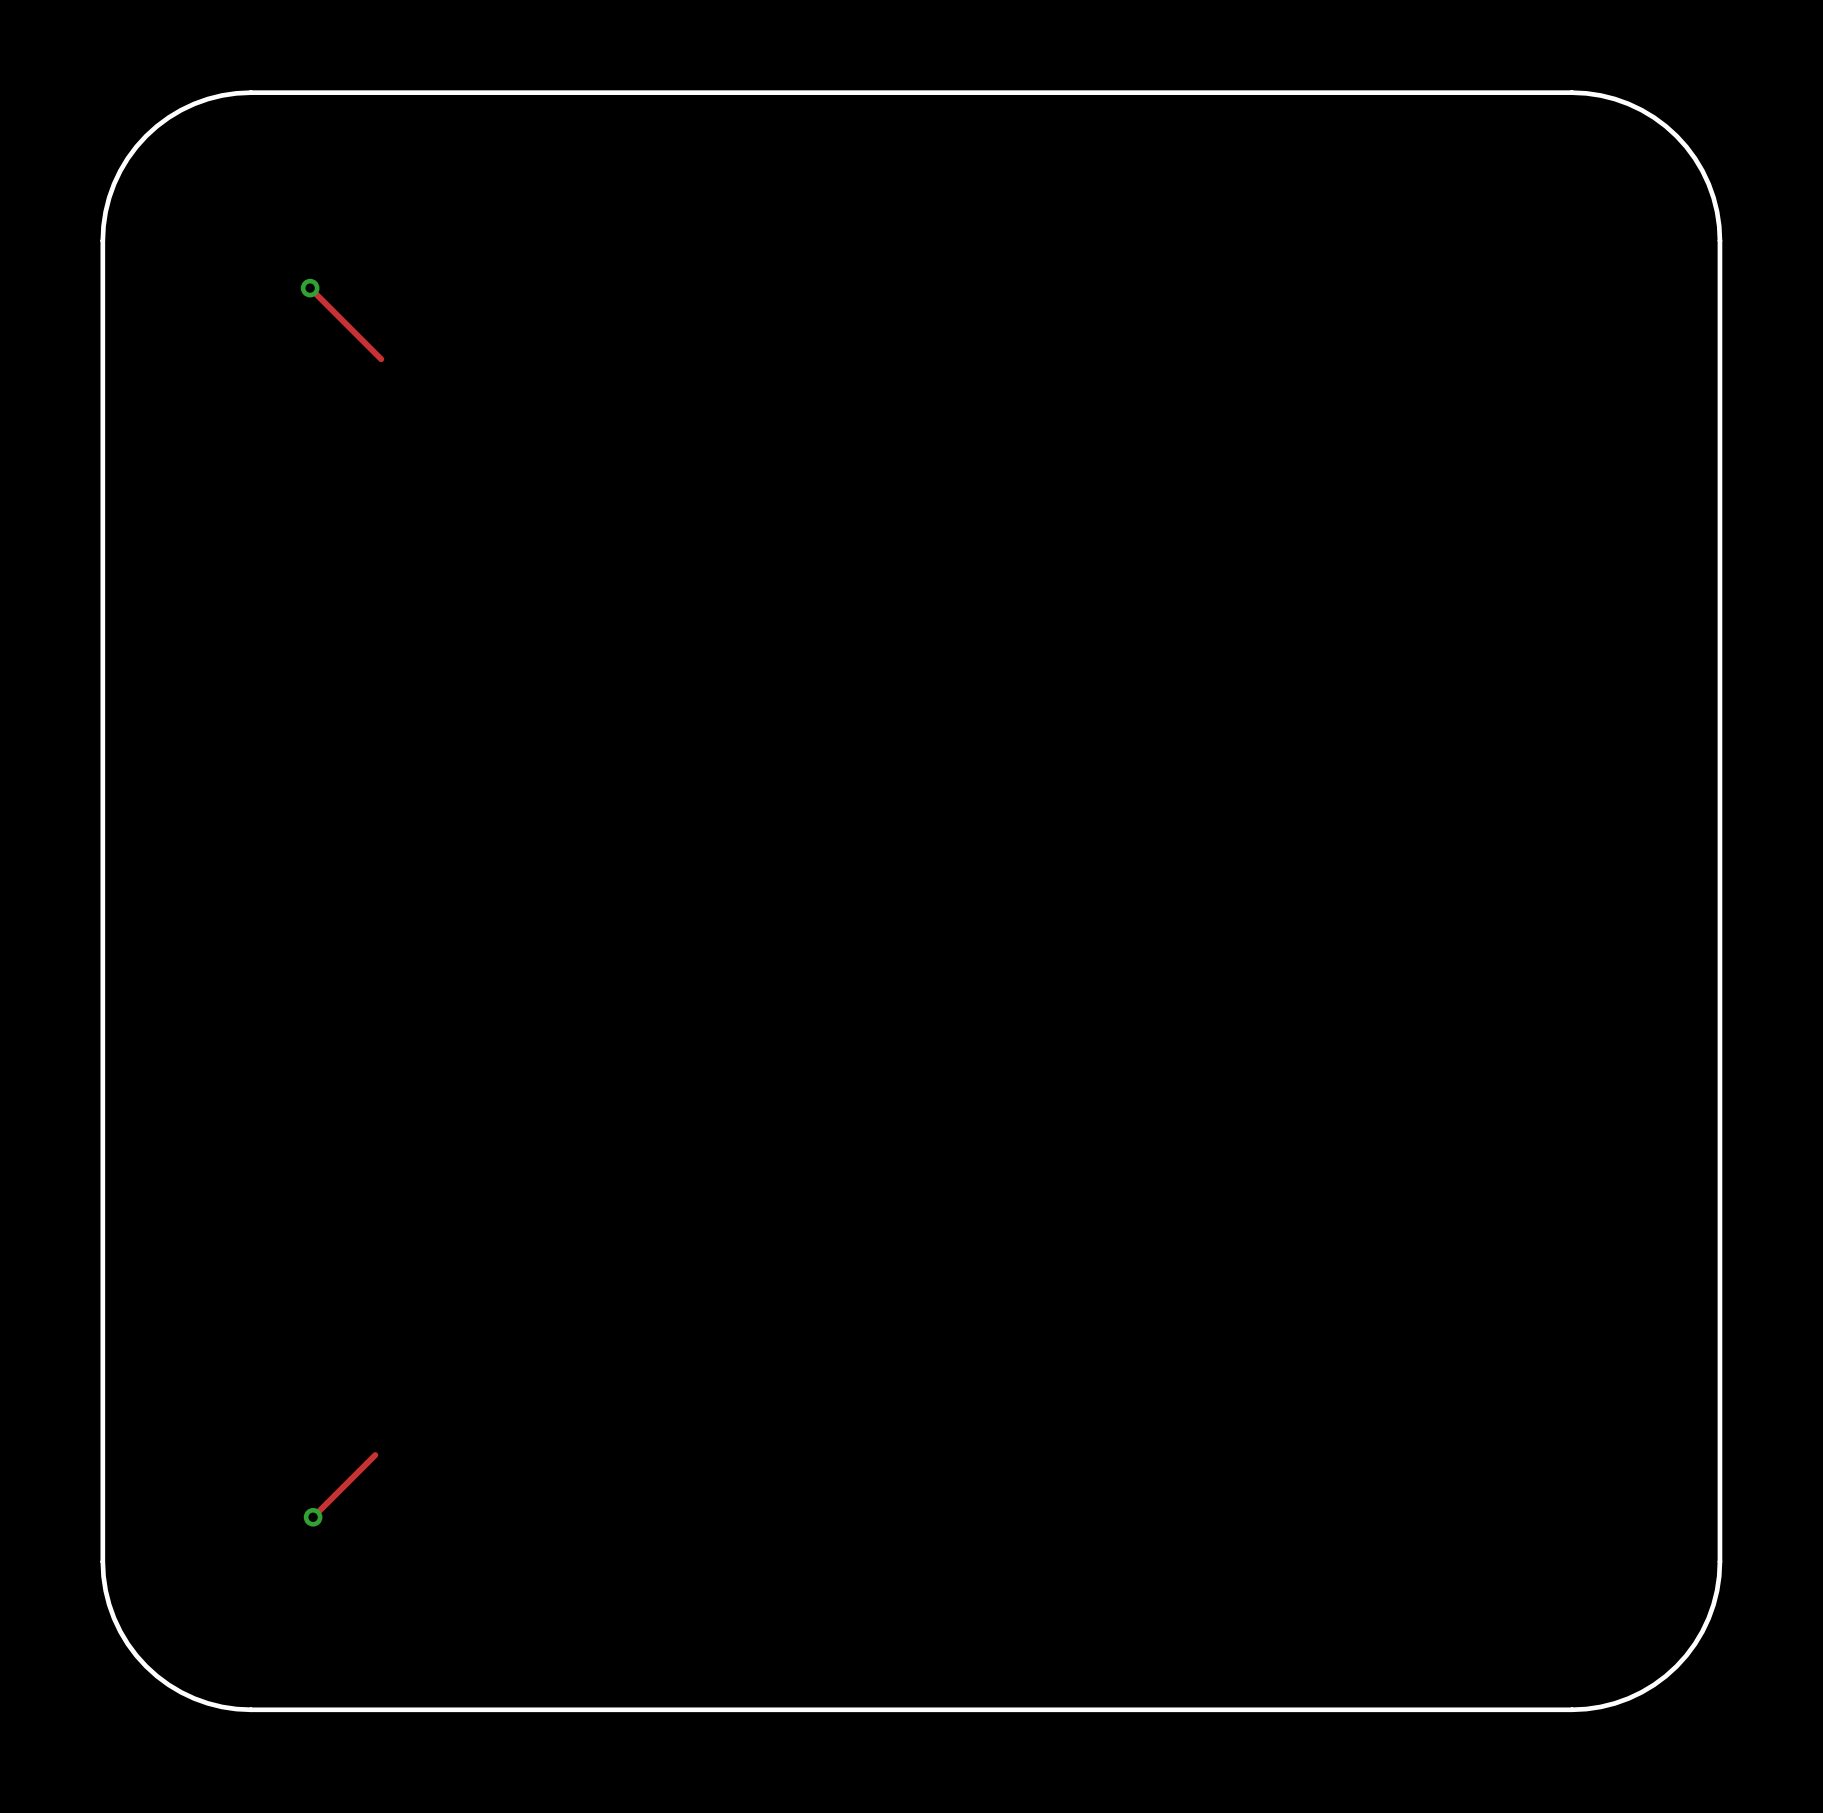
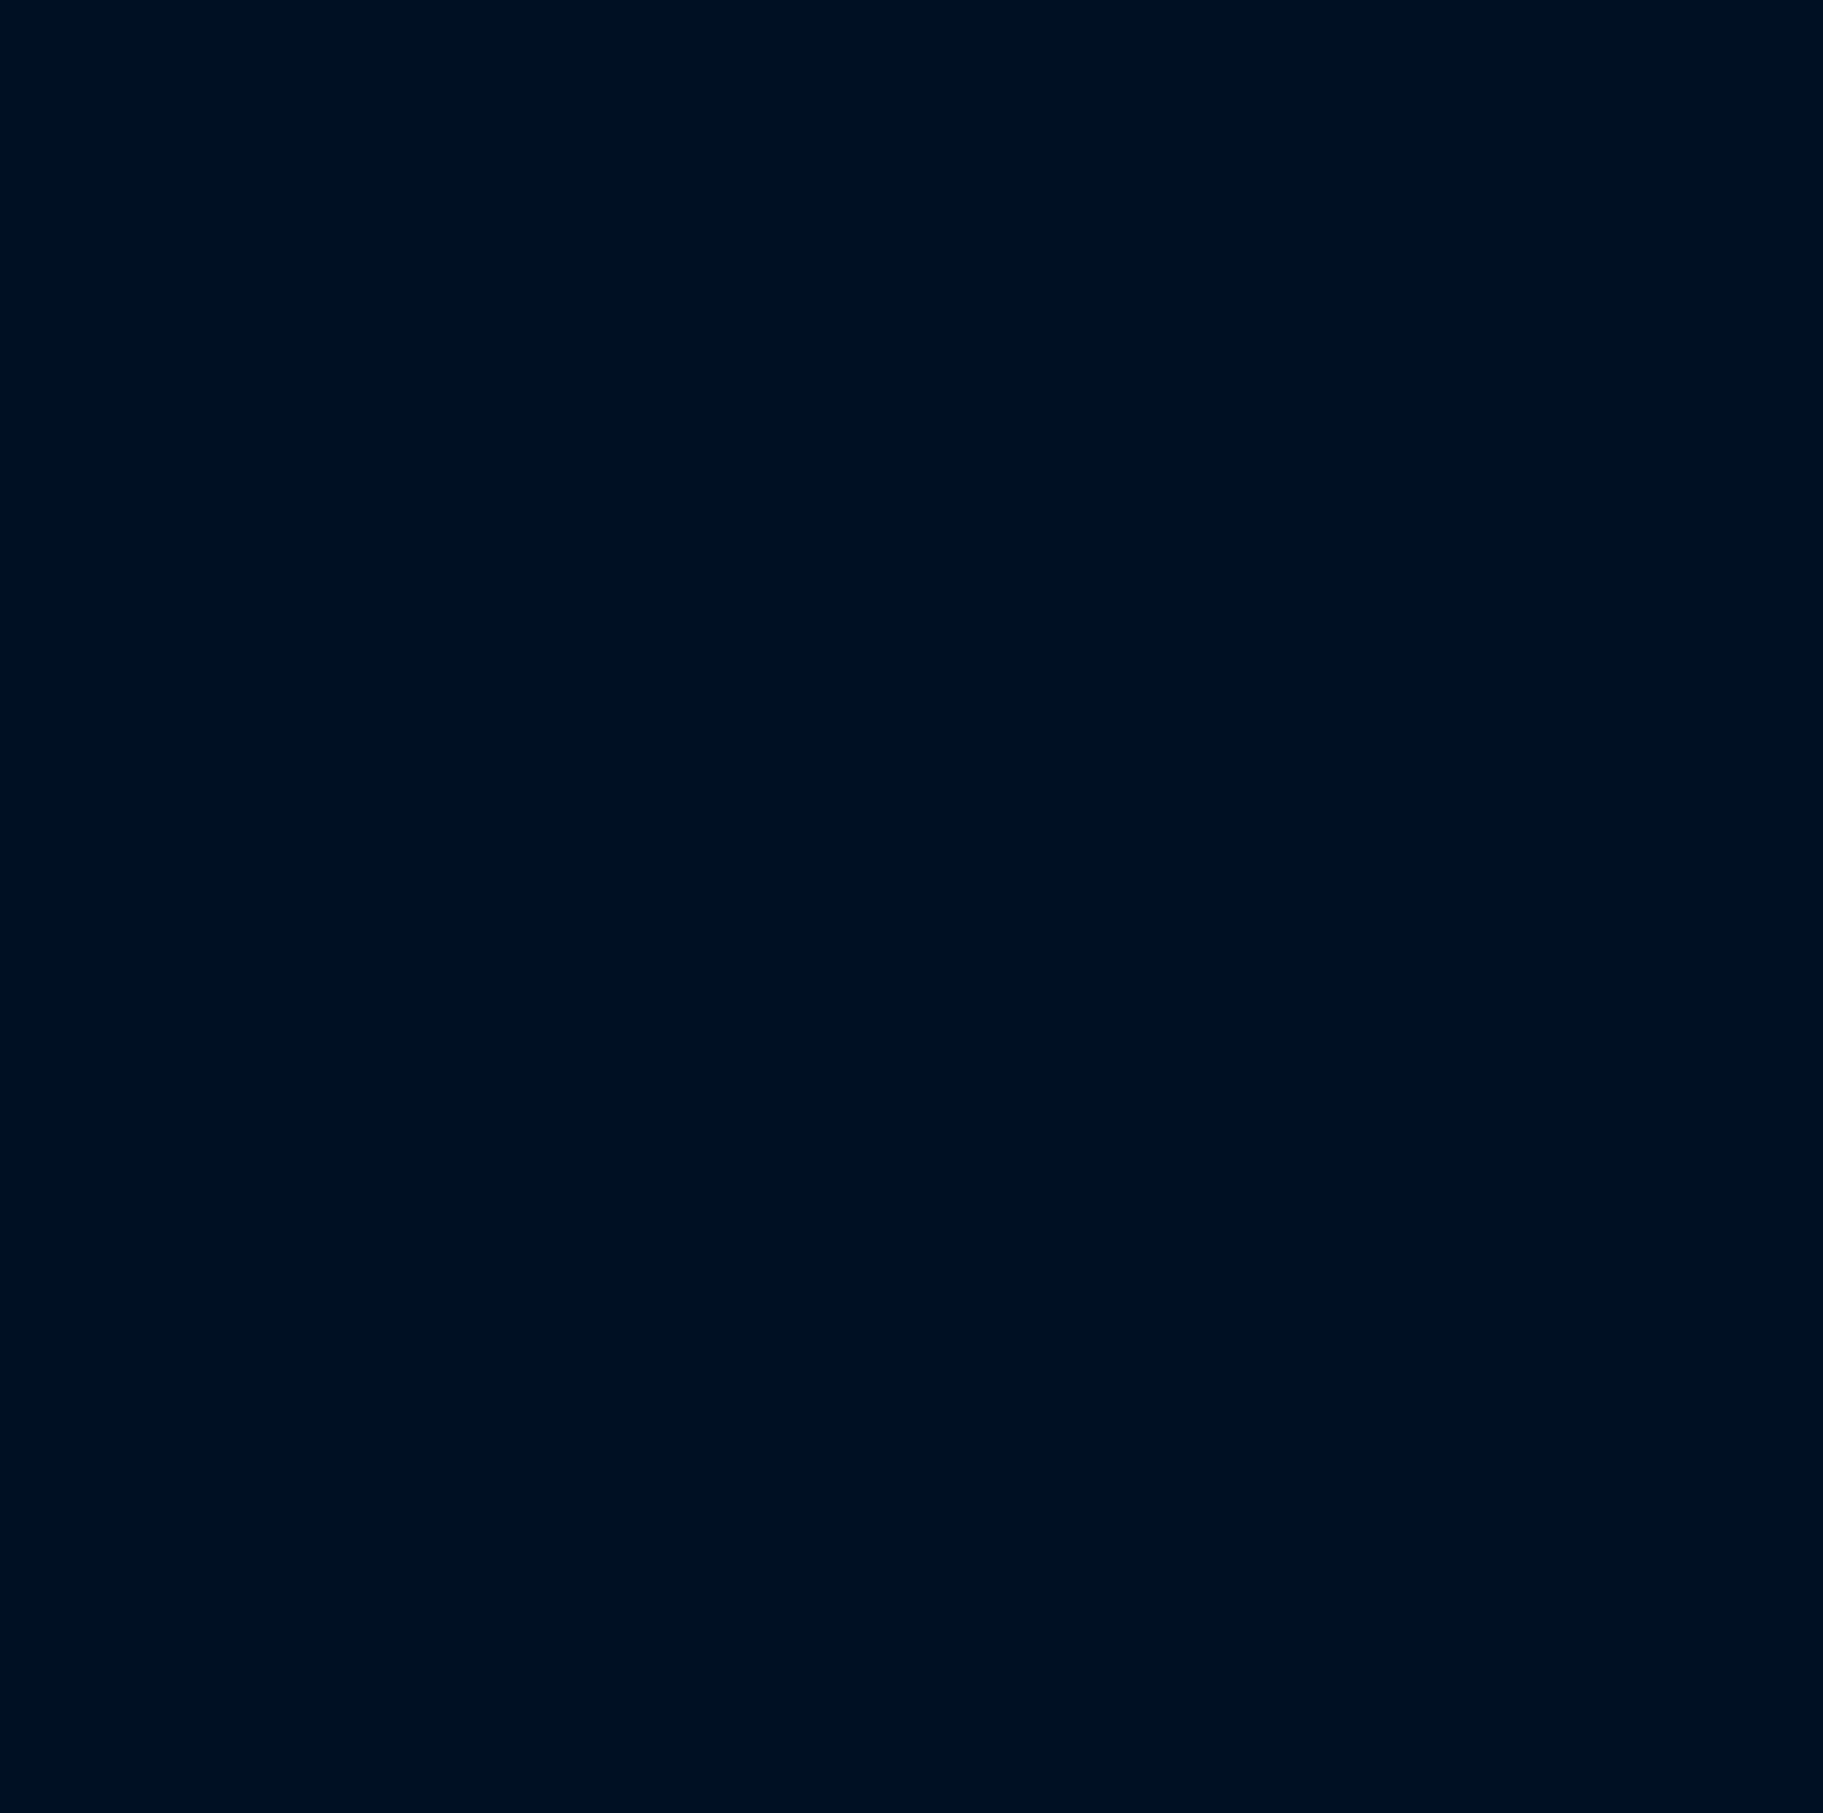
board edge: (250, 92) (1571, 92) (1600, 95) (1641, 110) (1665, 126) (1686, 146) (1702, 170) (1713, 197) (1719, 240) (1719, 1561) (1713, 1604) (1702, 1631) (1686, 1655) (1665, 1676) (1641, 1692) (1614, 1703) (1571, 1709) (250, 1709) (222, 1706) (194, 1698) (156, 1676) (136, 1655) (114, 1618) (105, 1590) (102, 1561) (103, 226) (109, 197) (120, 170) (146, 136) (168, 117) (194, 103) (222, 95) (250, 92) -> none
track: (310, 288) (381, 359) -> none
via: (310, 288) -> none
track: (375, 1455) (313, 1517) -> none
via: (313, 1517) -> none

